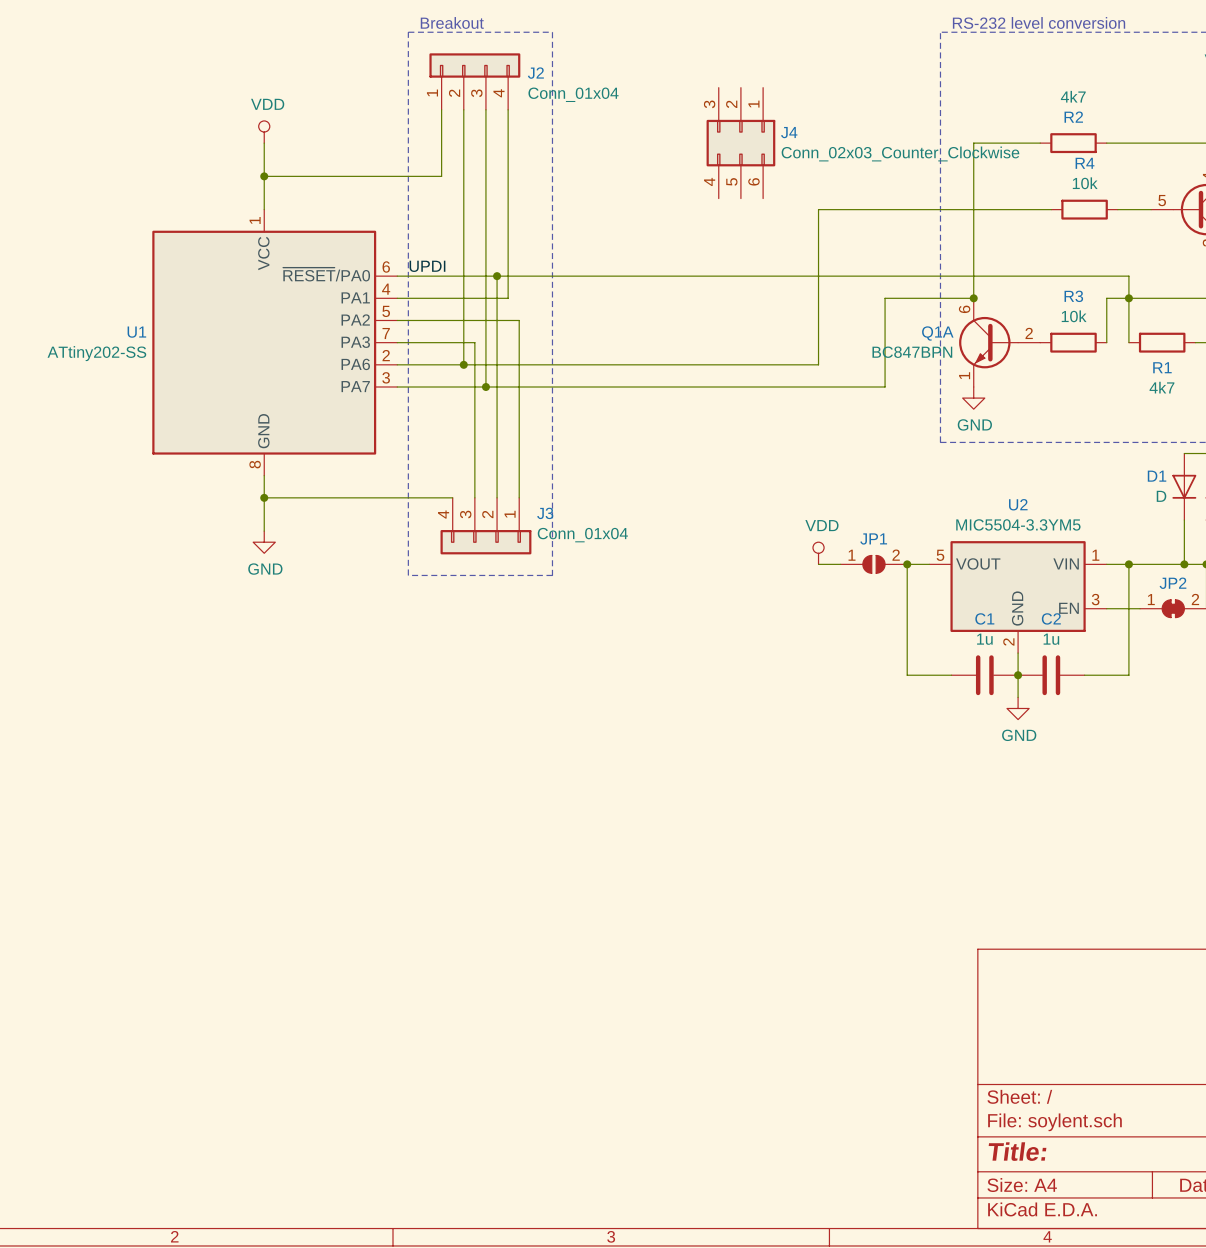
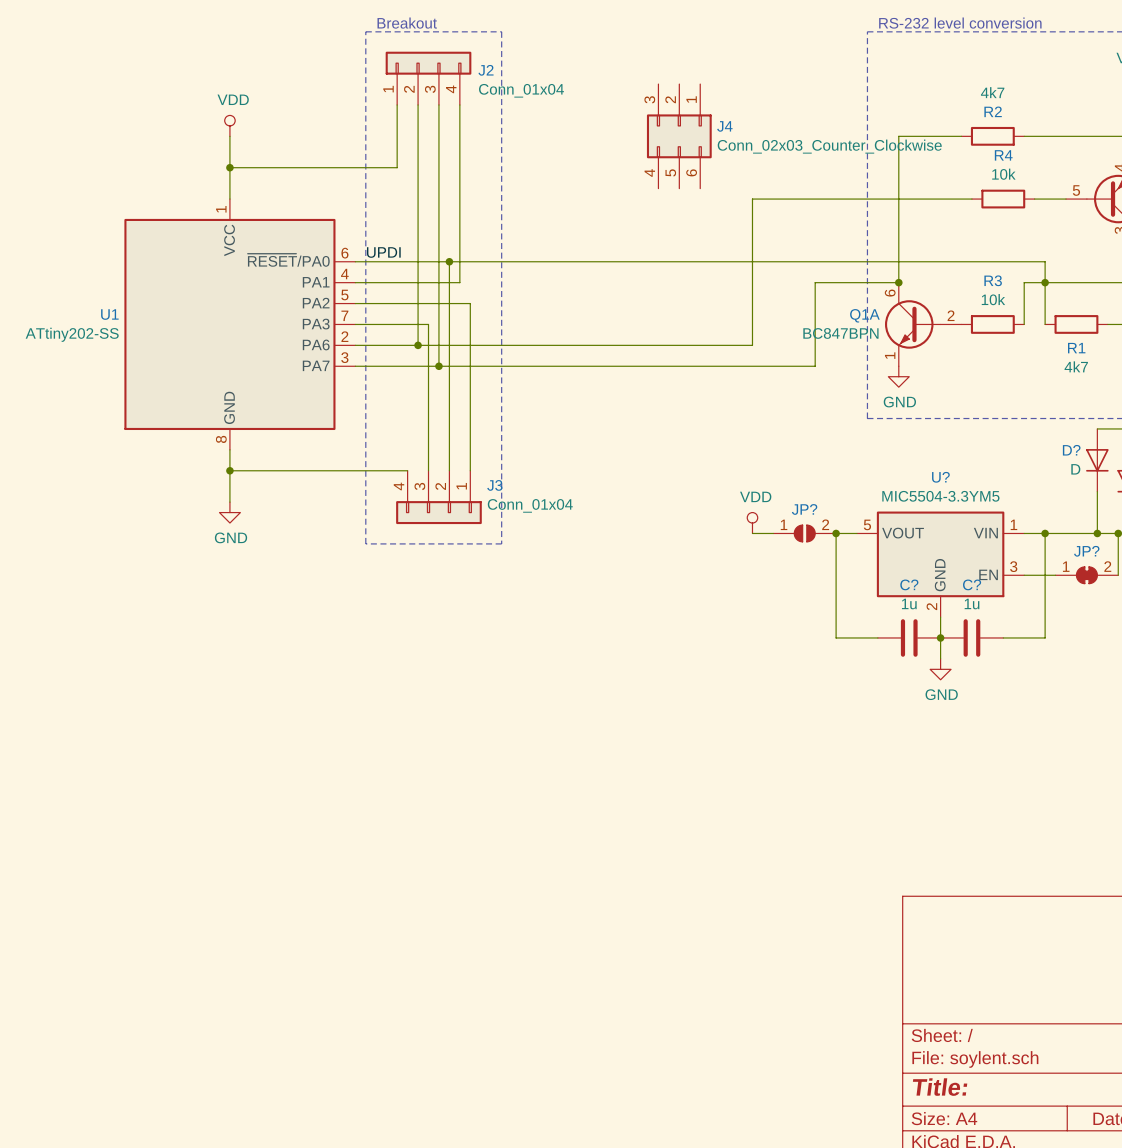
D1 name: D1 (1157, 476) -> D? (1071, 450)
U2 name: U2 (1018, 504) -> U? (940, 477)
JP1 name: JP1 (873, 538) -> JP? (804, 509)
JP2 name: JP2 (1172, 583) -> JP? (1086, 551)
C1 name: C1 (984, 618) -> C? (909, 584)
C2 name: C2 (1051, 618) -> C? (972, 584)

